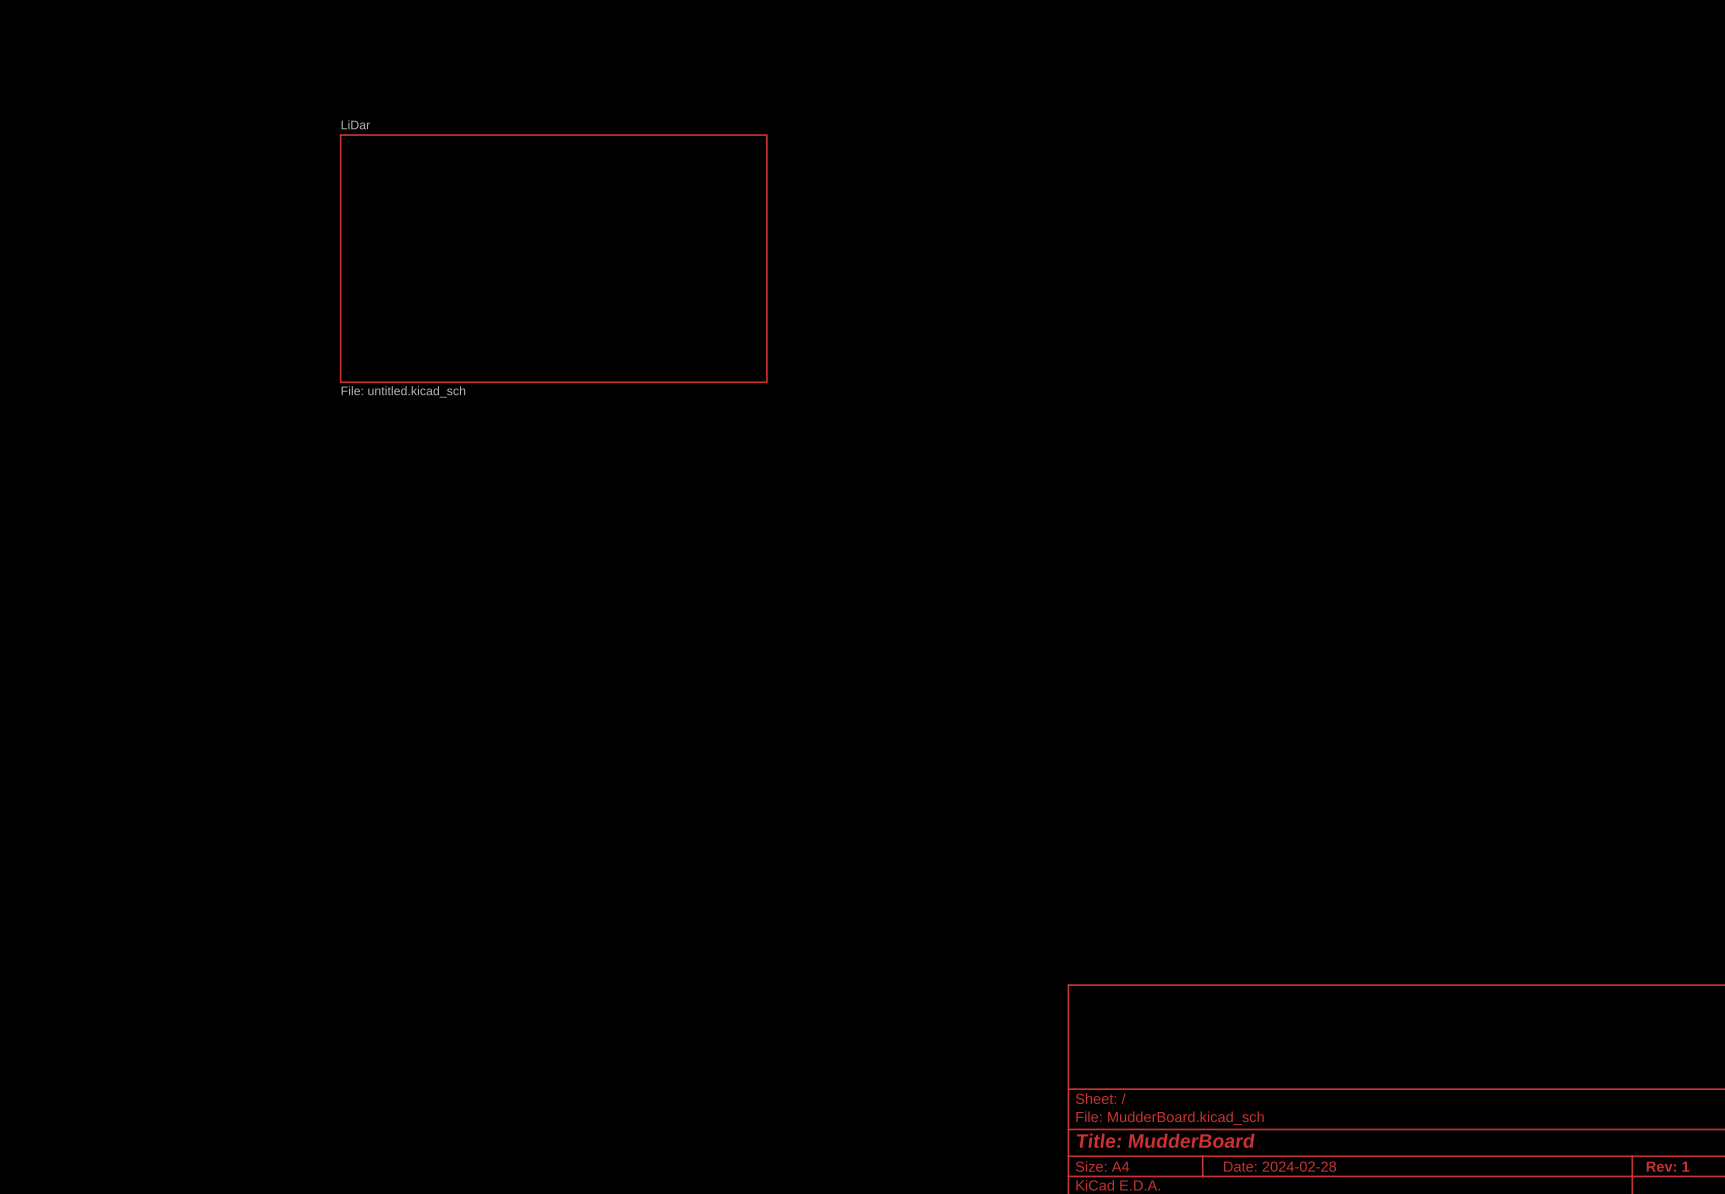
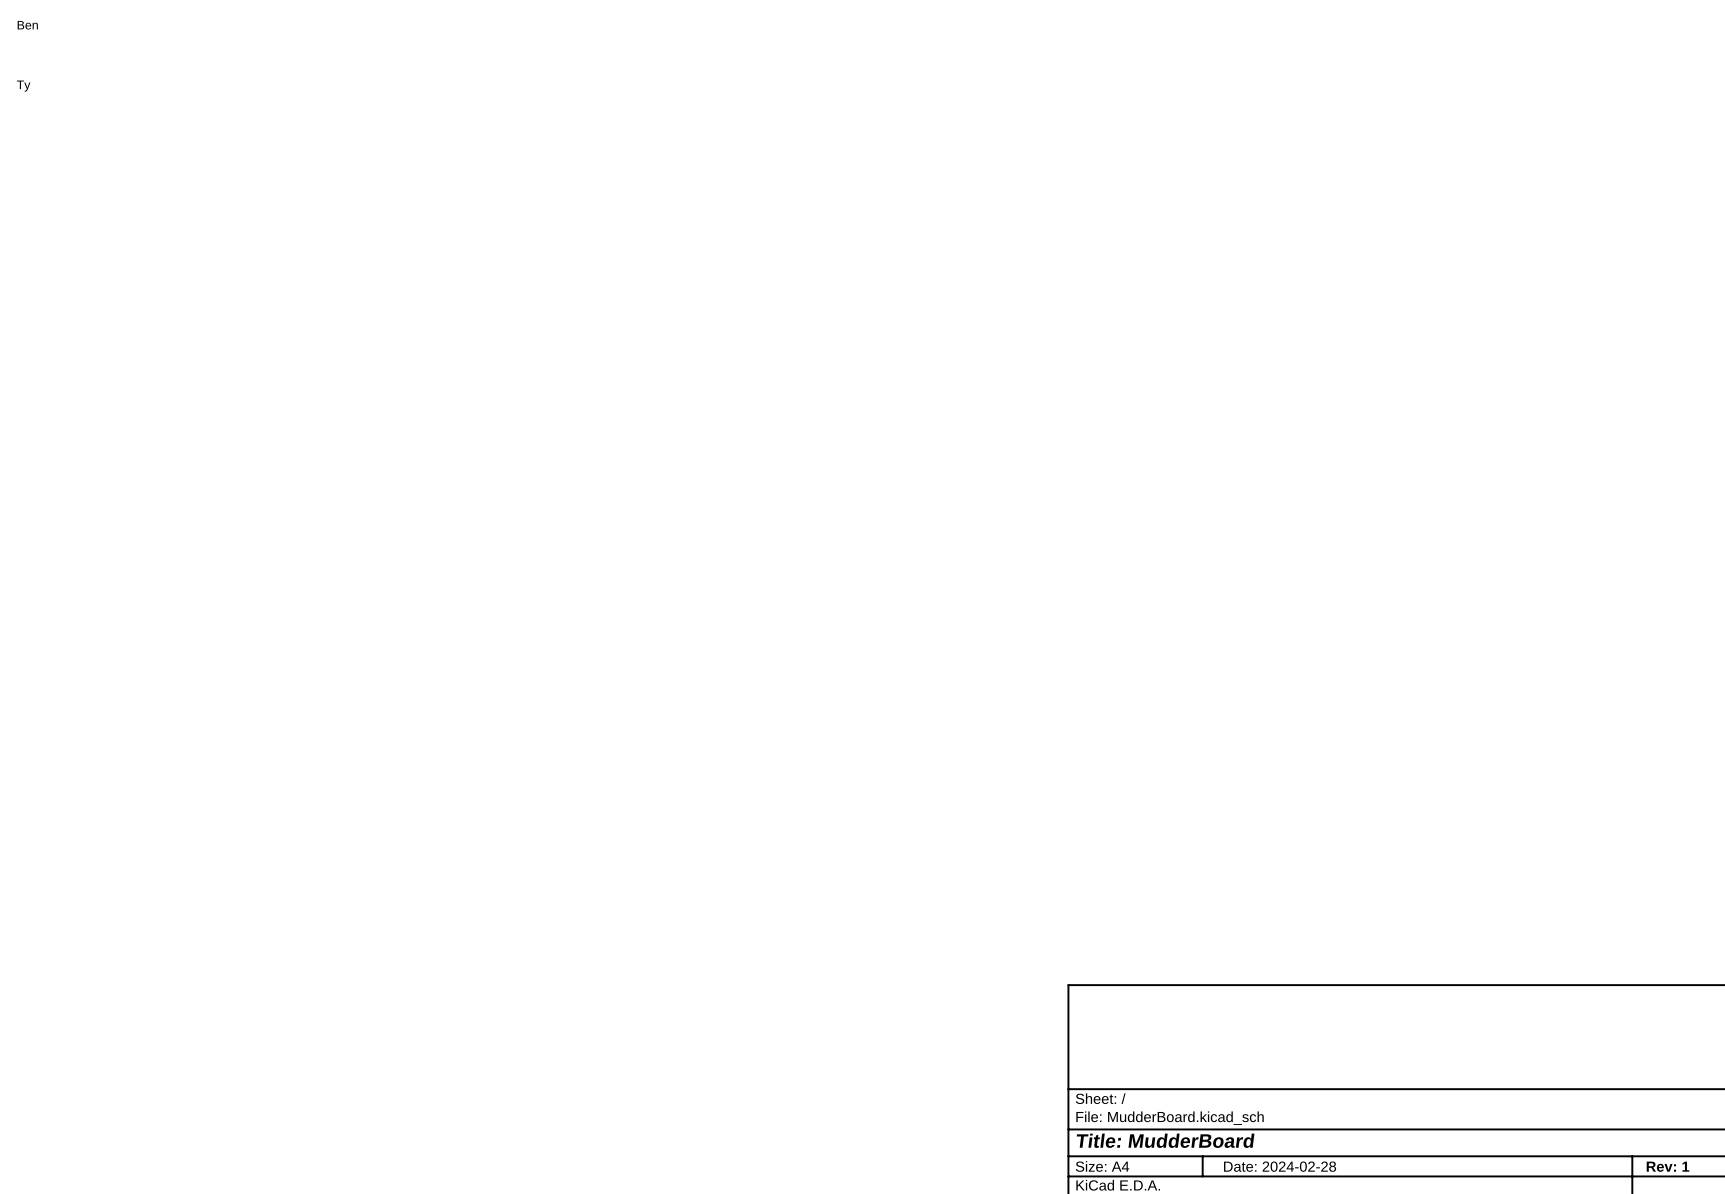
label: none -> Ben (27, 25)
label: none -> Ty (23, 86)
sheet LiDar: File: untitled.kicad_sch (553, 258) -> none

